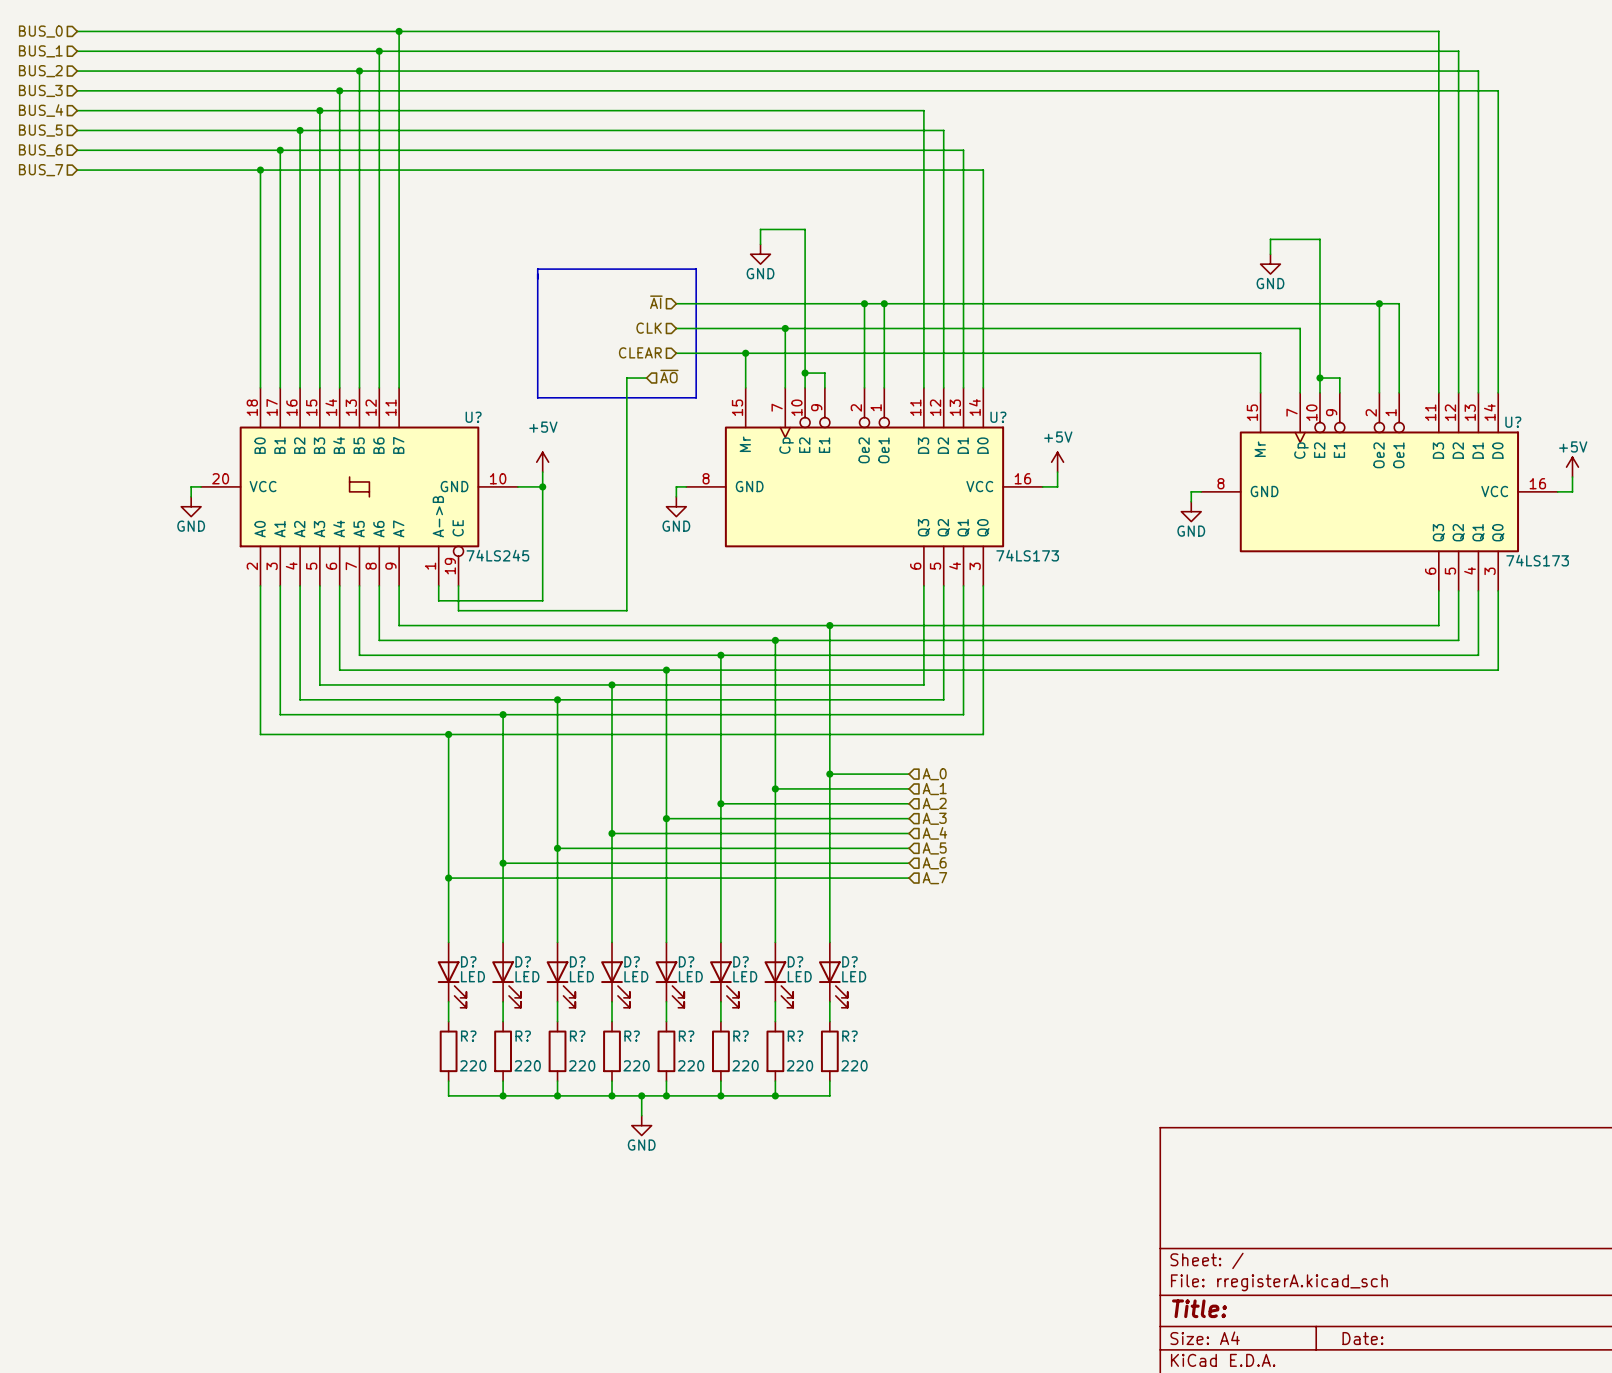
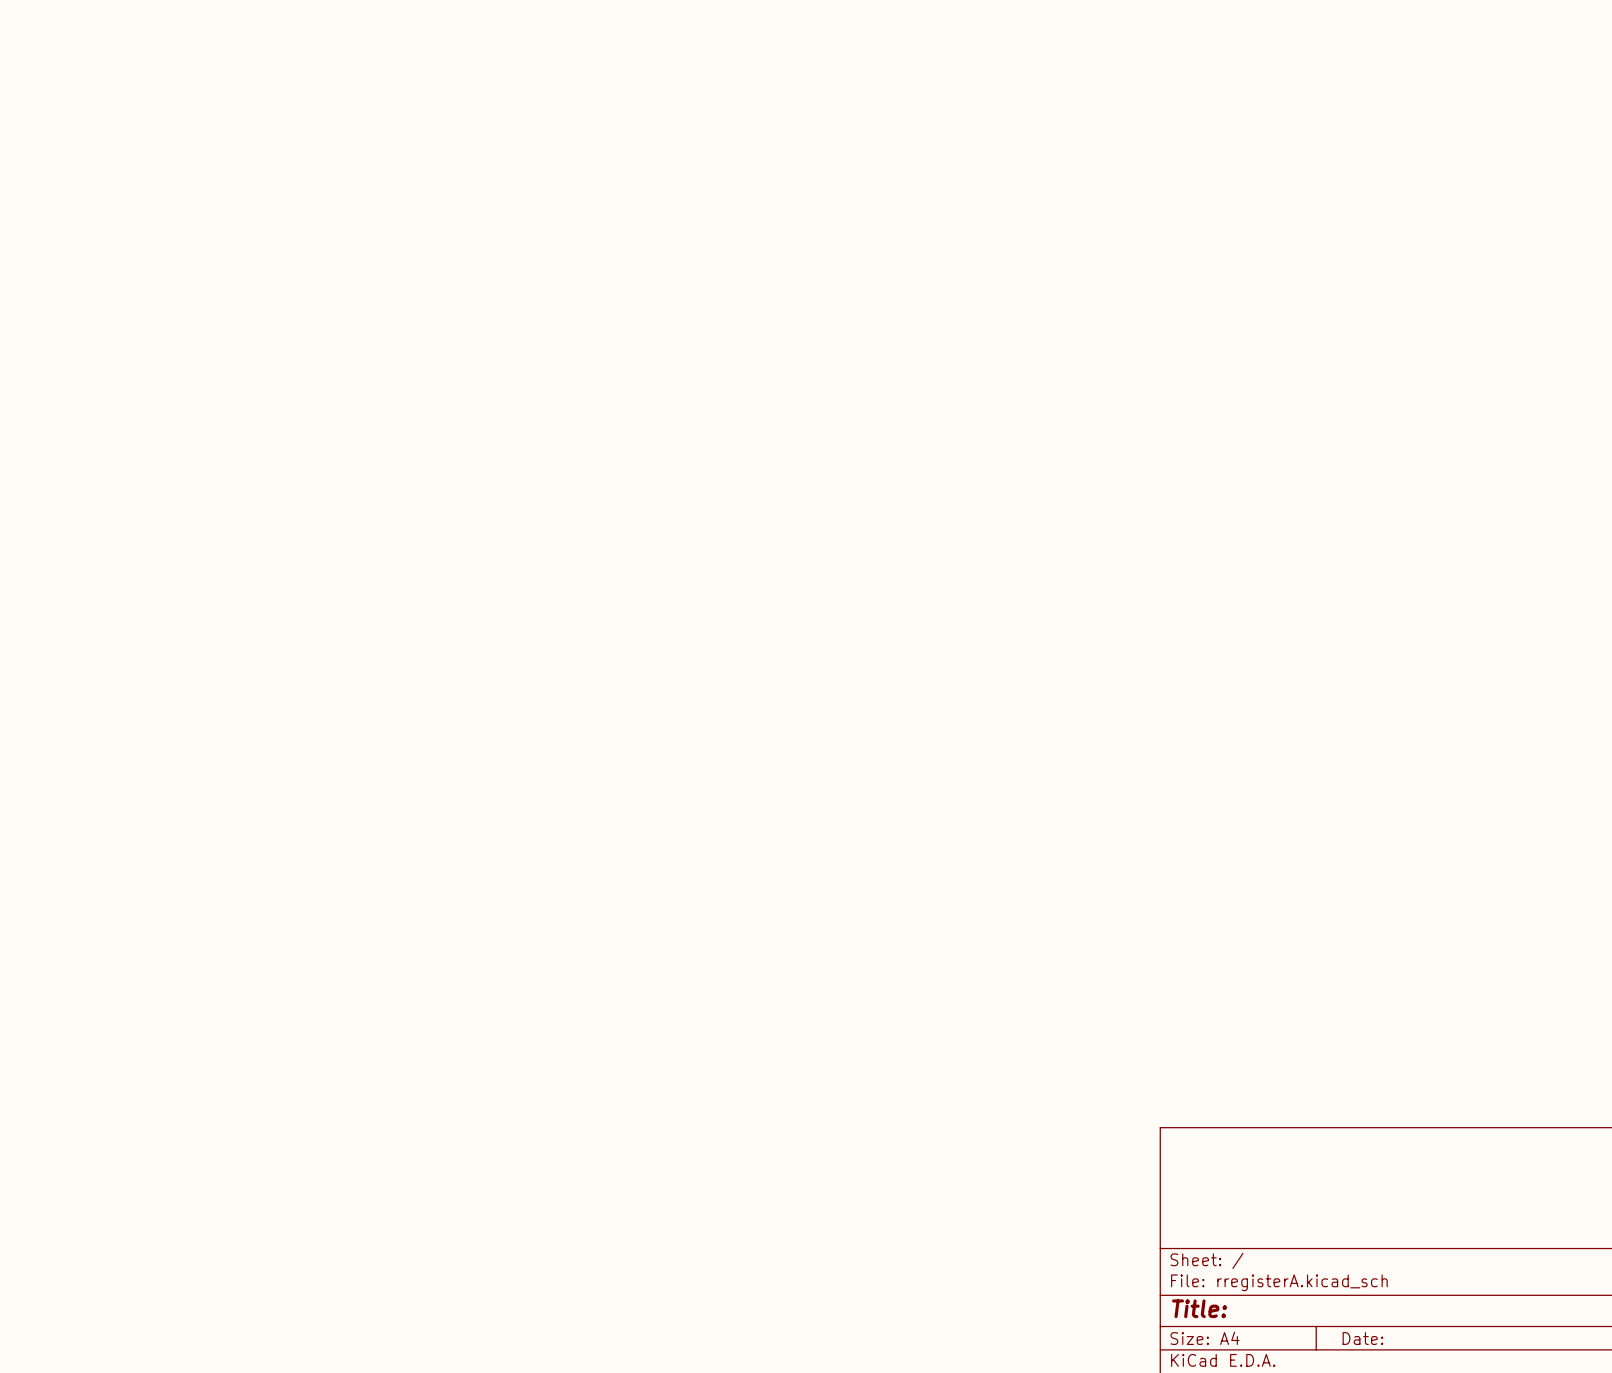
hierarchical label: BUS_0 (40, 31) -> none
wire: (77, 31) (1438, 31) (1438, 392) -> none
wire: (399, 31) (399, 387) -> none
junction: (399, 31) -> none
hierarchical label: BUS_1 (40, 51) -> none
wire: (77, 51) (1458, 51) (1458, 392) -> none
wire: (379, 51) (379, 387) -> none
junction: (379, 51) -> none
hierarchical label: BUS_2 (40, 71) -> none
wire: (77, 71) (1478, 71) (1478, 392) -> none
wire: (359, 71) (359, 387) -> none
junction: (359, 71) -> none
hierarchical label: BUS_3 (40, 90) -> none
wire: (77, 90) (1498, 90) (1498, 392) -> none
wire: (339, 90) (339, 387) -> none
junction: (339, 90) -> none
hierarchical label: BUS_4 (41, 110) -> none
wire: (77, 110) (923, 110) (923, 387) -> none
wire: (319, 110) (319, 387) -> none
junction: (319, 110) -> none
hierarchical label: BUS_5 (40, 130) -> none
wire: (77, 130) (943, 130) (943, 387) -> none
wire: (300, 130) (300, 387) -> none
junction: (300, 130) -> none
hierarchical label: BUS_6 (40, 150) -> none
wire: (77, 150) (963, 150) (963, 387) -> none
wire: (280, 150) (280, 387) -> none
junction: (280, 150) -> none
hierarchical label: BUS_7 (41, 170) -> none
wire: (77, 170) (983, 170) (983, 387) -> none
wire: (260, 170) (260, 387) -> none
junction: (260, 170) -> none
wire: (760, 244) (760, 229) (805, 229) (805, 387) -> none
power symbol: GND (760, 254) -> none
wire: (1270, 254) (1270, 239) (1319, 239) (1319, 392) -> none
power symbol: GND (1270, 264) -> none
line: (537, 269) (537, 397) (696, 397) (696, 269) (537, 269) -> none
hierarchical label: ~{AI} (656, 302) -> none
wire: (676, 303) (1399, 303) (1399, 392) -> none
wire: (864, 303) (864, 387) -> none
junction: (864, 303) -> none
wire: (884, 303) (884, 387) -> none
junction: (884, 303) -> none
wire: (1379, 303) (1379, 392) -> none
junction: (1379, 303) -> none
hierarchical label: CLK (649, 328) -> none
wire: (676, 328) (1300, 328) (1300, 392) -> none
wire: (785, 328) (785, 387) -> none
junction: (785, 328) -> none
hierarchical label: CLEAR (640, 352) -> none
wire: (676, 353) (1260, 353) (1260, 392) -> none
wire: (745, 353) (745, 387) -> none
junction: (745, 353) -> none
wire: (805, 373) (824, 373) (824, 387) -> none
junction: (805, 373) -> none
hierarchical label: ~{AO} (669, 376) -> none
wire: (646, 378) (626, 378) (626, 610) (458, 610) (458, 585) -> none
wire: (1319, 378) (1339, 378) (1339, 392) -> none
junction: (1319, 378) -> none
power symbol: +5V (542, 462) -> none
power symbol: +5V (1057, 462) -> none
power symbol: +5V (1572, 467) -> none
wire: (542, 472) (542, 600) (438, 600) (438, 585) -> none
wire: (1057, 472) (1057, 486) (1042, 486) -> none
wire: (1572, 477) (1572, 491) (1557, 491) -> none
wire: (201, 486) (191, 486) (191, 496) -> none
U?: 74LS245 (359, 486) -> none
wire: (517, 486) (542, 486) -> none
junction: (542, 486) -> none
wire: (686, 486) (676, 486) (676, 496) -> none
U?: 74LS173 (864, 486) -> none
wire: (1201, 491) (1191, 491) (1191, 501) -> none
U?: 74LS173 (1379, 491) -> none
power symbol: GND (191, 506) -> none
power symbol: GND (676, 506) -> none
power symbol: GND (1191, 511) -> none
wire: (260, 585) (260, 734) (983, 734) (983, 585) -> none
wire: (280, 585) (280, 714) (963, 714) (963, 585) -> none
wire: (300, 585) (300, 699) (943, 699) (943, 585) -> none
wire: (319, 585) (319, 684) (923, 684) (923, 585) -> none
wire: (339, 585) (339, 670) (1498, 670) (1498, 590) -> none
wire: (359, 585) (359, 655) (1478, 655) (1478, 590) -> none
wire: (379, 585) (379, 640) (1458, 640) (1458, 590) -> none
wire: (399, 585) (399, 625) (1438, 625) (1438, 590) -> none
wire: (829, 625) (829, 942) -> none
junction: (829, 625) -> none
wire: (775, 640) (775, 788) -> none
junction: (775, 640) -> none
wire: (720, 655) (720, 942) -> none
junction: (720, 655) -> none
wire: (666, 670) (666, 818) -> none
junction: (666, 670) -> none
wire: (612, 684) (612, 942) -> none
junction: (612, 684) -> none
wire: (557, 699) (557, 942) -> none
junction: (557, 699) -> none
wire: (503, 714) (503, 942) -> none
junction: (503, 714) -> none
wire: (448, 734) (448, 942) -> none
junction: (448, 734) -> none
wire: (829, 774) (909, 774) -> none
junction: (829, 774) -> none
hierarchical label: A_0 (934, 774) -> none
wire: (775, 788) (909, 788) -> none
wire: (775, 788) (775, 942) -> none
junction: (775, 788) -> none
hierarchical label: A_1 (934, 789) -> none
wire: (720, 803) (909, 803) -> none
junction: (720, 803) -> none
hierarchical label: A_2 (934, 803) -> none
wire: (666, 818) (666, 942) -> none
wire: (666, 818) (909, 818) -> none
junction: (666, 818) -> none
hierarchical label: A_3 (934, 818) -> none
wire: (612, 833) (909, 833) -> none
junction: (612, 833) -> none
hierarchical label: A_4 (934, 833) -> none
wire: (557, 848) (909, 848) -> none
junction: (557, 848) -> none
hierarchical label: A_5 (934, 848) -> none
wire: (503, 863) (909, 863) -> none
junction: (503, 863) -> none
hierarchical label: A_6 (934, 863) -> none
wire: (448, 878) (909, 878) -> none
junction: (448, 878) -> none
hierarchical label: A_7 (934, 878) -> none
D?: LED (452, 975) -> none
D?: LED (506, 975) -> none
D?: LED (561, 975) -> none
D?: LED (615, 975) -> none
D?: LED (669, 975) -> none
D?: LED (724, 975) -> none
D?: LED (778, 975) -> none
D?: LED (833, 975) -> none
wire: (448, 1001) (448, 1021) -> none
wire: (503, 1001) (503, 1021) -> none
wire: (557, 1001) (557, 1021) -> none
wire: (612, 1001) (612, 1021) -> none
wire: (666, 1001) (666, 1021) -> none
wire: (720, 1001) (720, 1021) -> none
wire: (775, 1001) (775, 1021) -> none
wire: (829, 1001) (829, 1021) -> none
R?: 220 (448, 1051) -> none
R?: 220 (503, 1051) -> none
R?: 220 (557, 1051) -> none
R?: 220 (612, 1051) -> none
R?: 220 (666, 1051) -> none
R?: 220 (720, 1051) -> none
R?: 220 (775, 1051) -> none
R?: 220 (829, 1051) -> none
wire: (448, 1081) (448, 1095) (829, 1095) (829, 1081) -> none
wire: (503, 1081) (503, 1095) -> none
wire: (557, 1081) (557, 1095) -> none
wire: (612, 1081) (612, 1095) -> none
wire: (666, 1081) (666, 1095) -> none
wire: (720, 1081) (720, 1095) -> none
wire: (775, 1081) (775, 1095) -> none
junction: (503, 1095) -> none
junction: (557, 1095) -> none
junction: (612, 1095) -> none
wire: (641, 1095) (641, 1115) -> none
junction: (641, 1095) -> none
junction: (666, 1095) -> none
junction: (720, 1095) -> none
junction: (775, 1095) -> none
power symbol: GND (641, 1125) -> none

